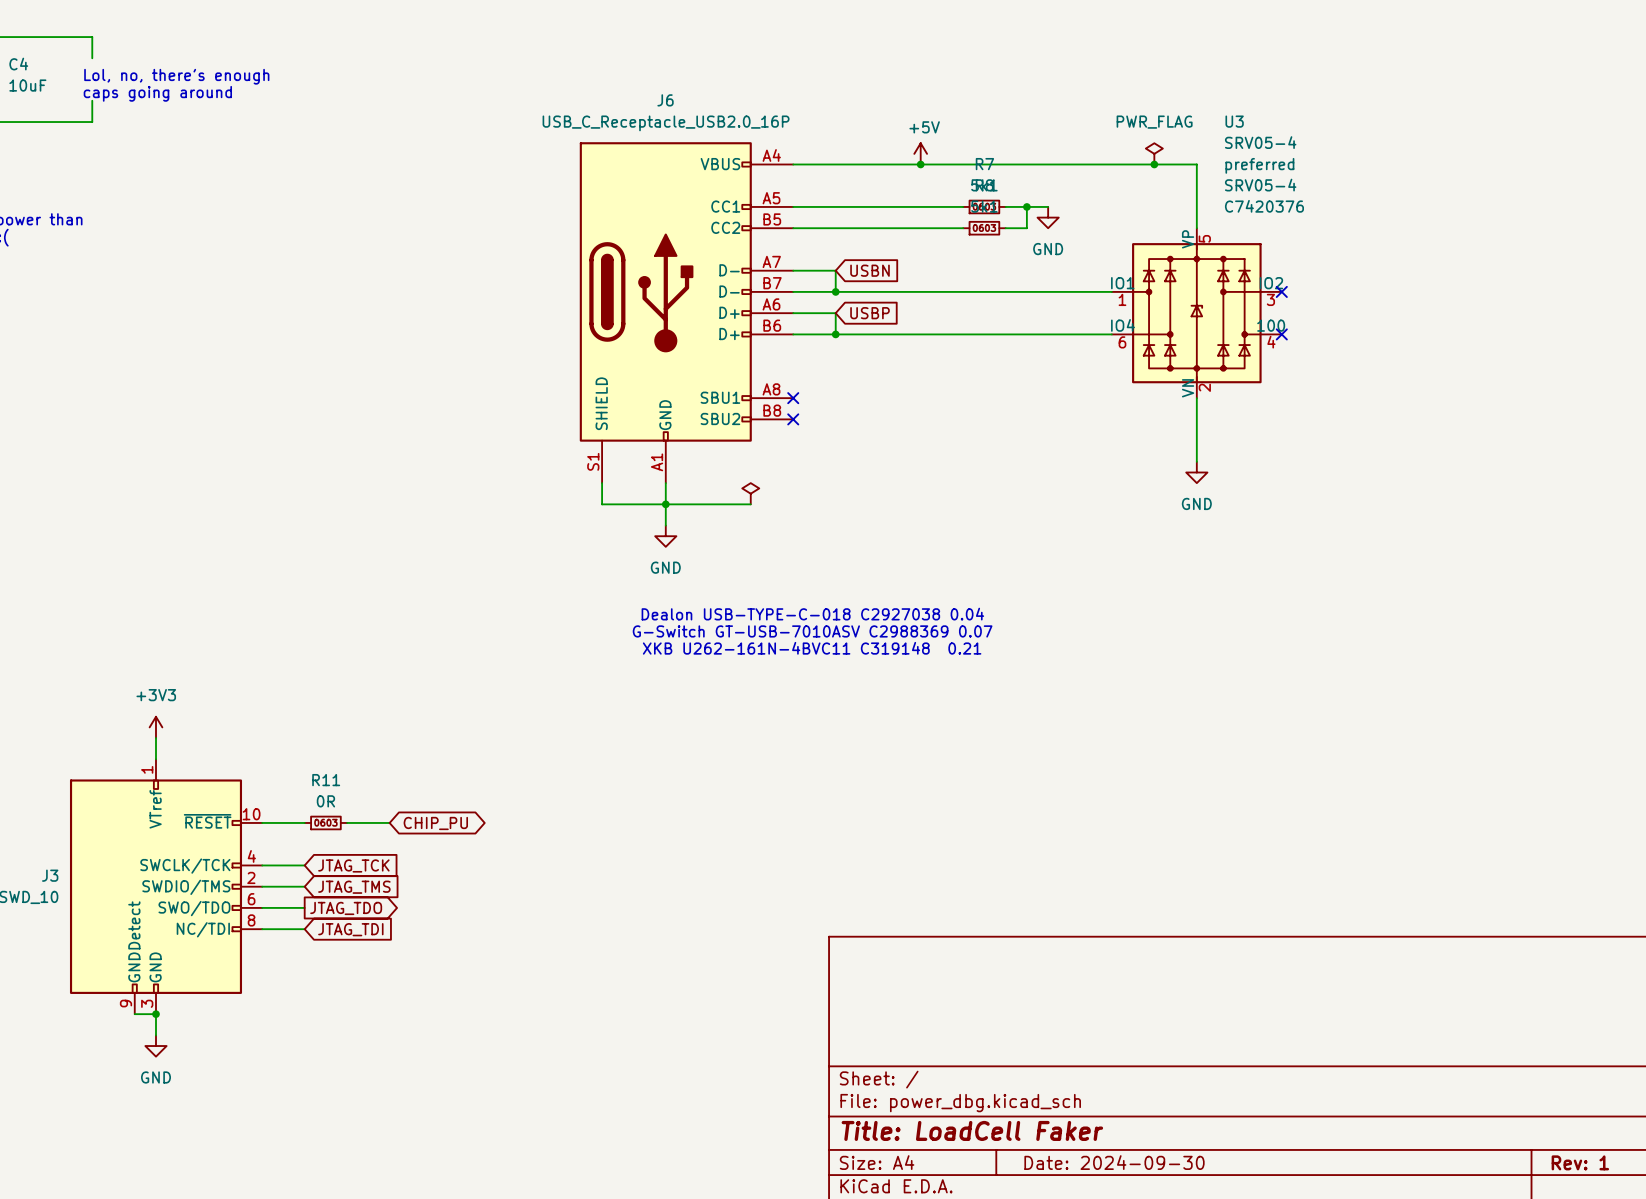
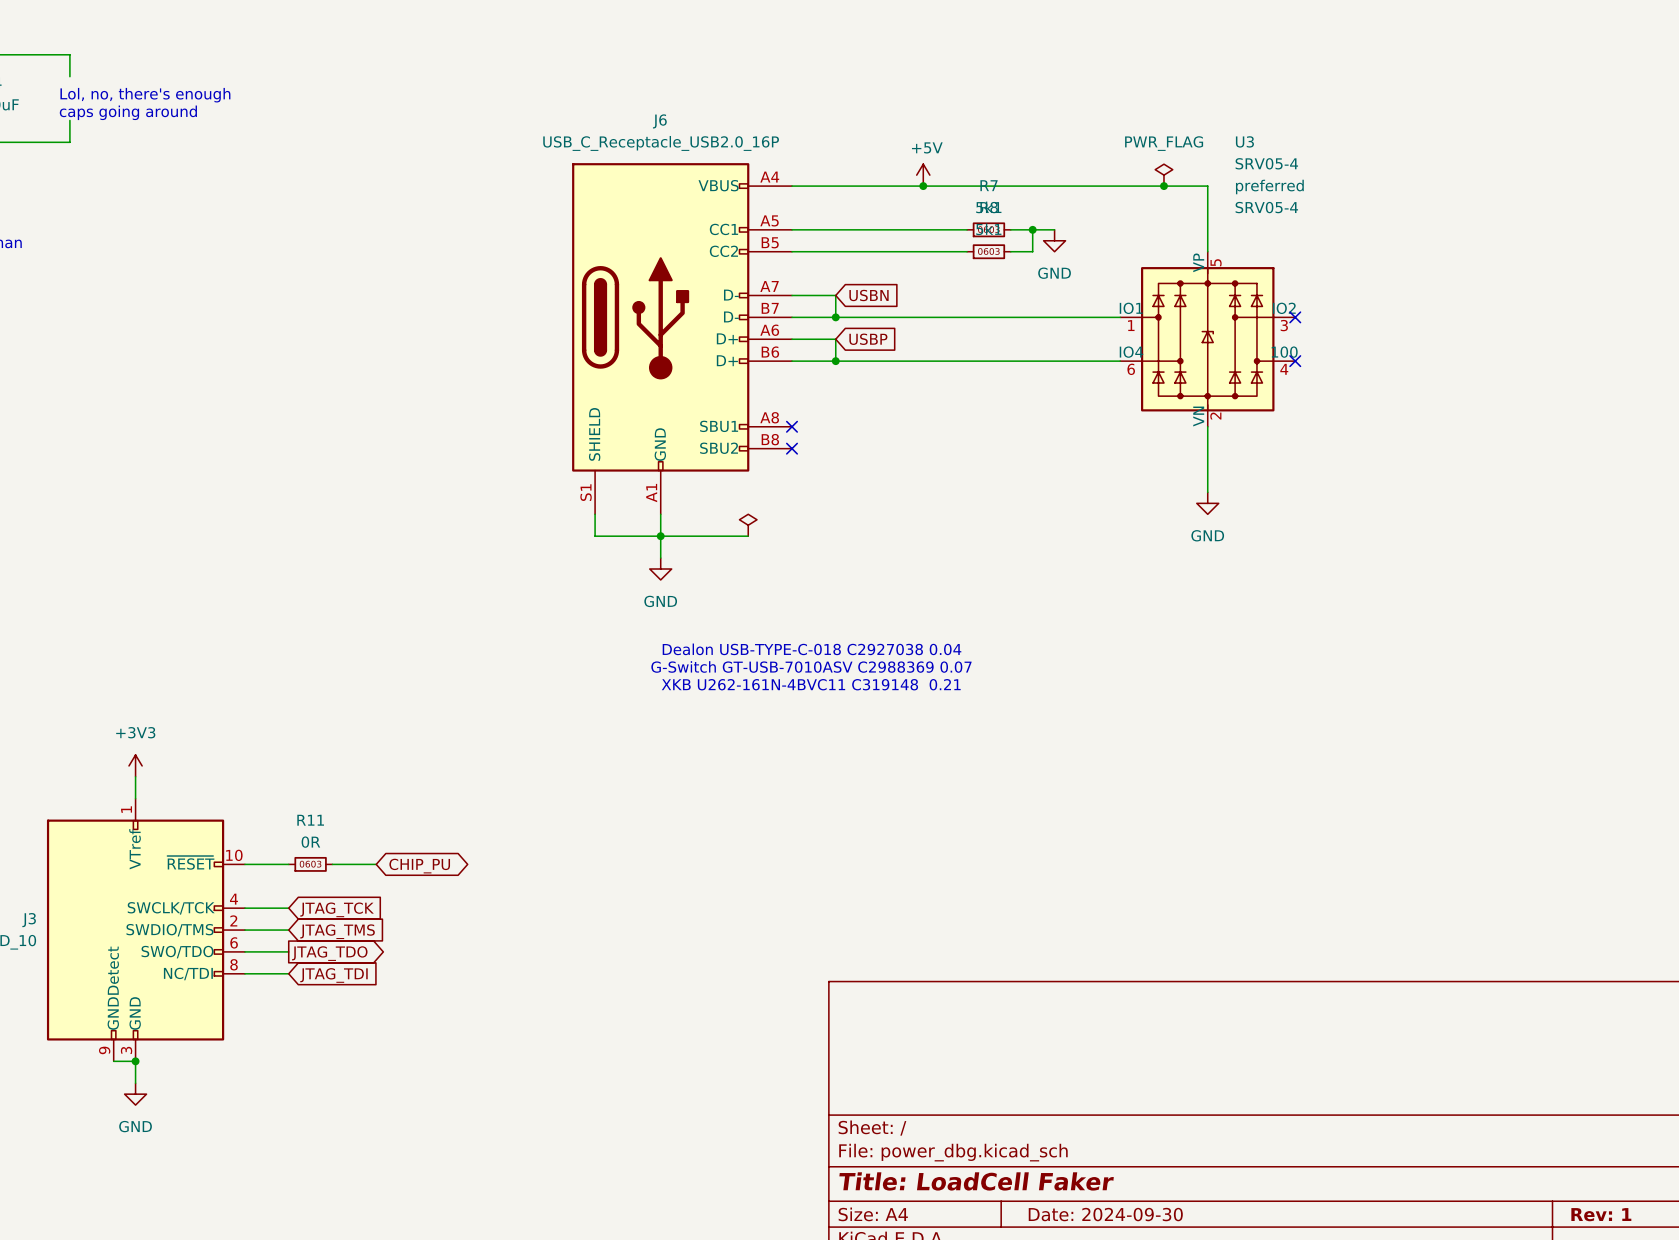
U3 text: C7420376 (1264, 206) -> none

